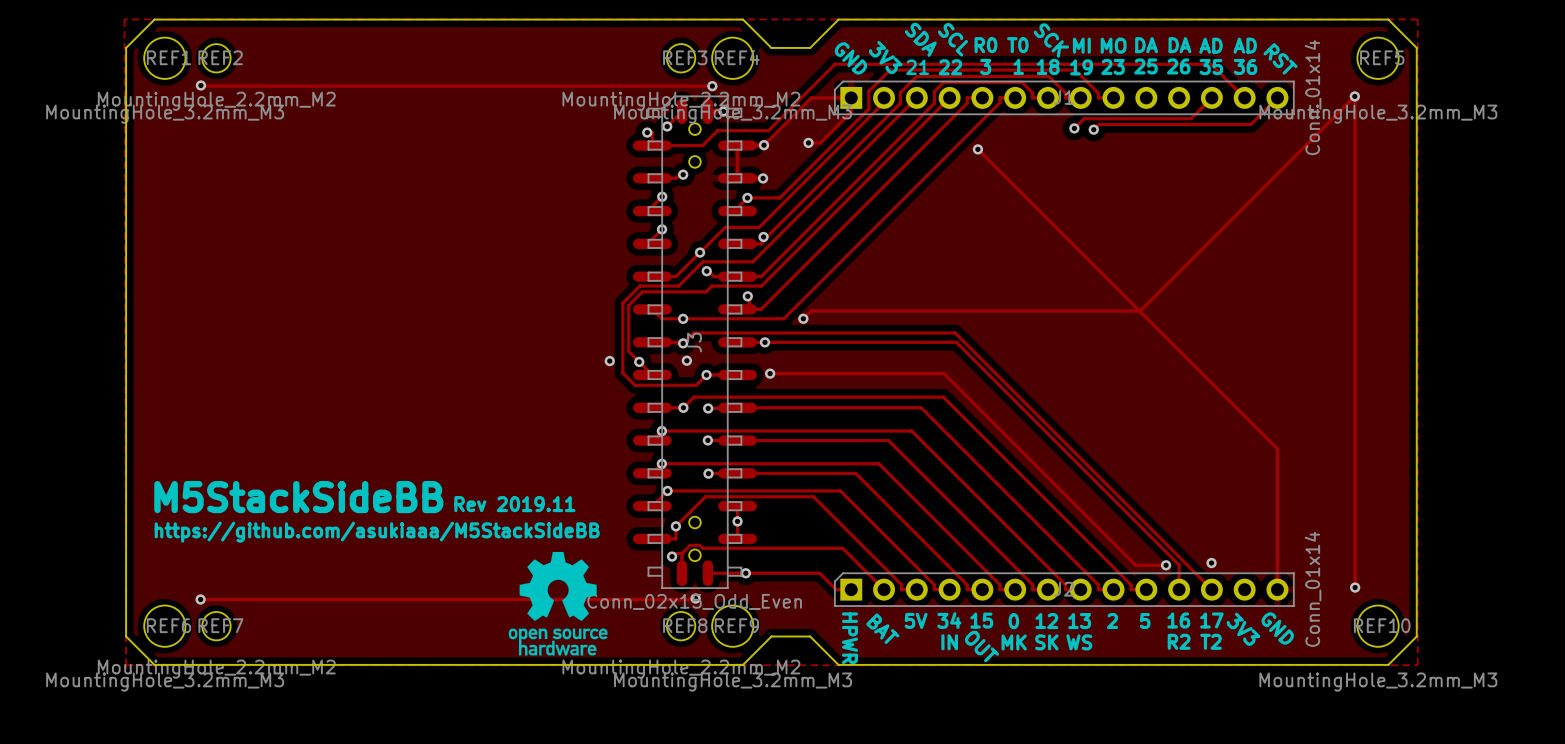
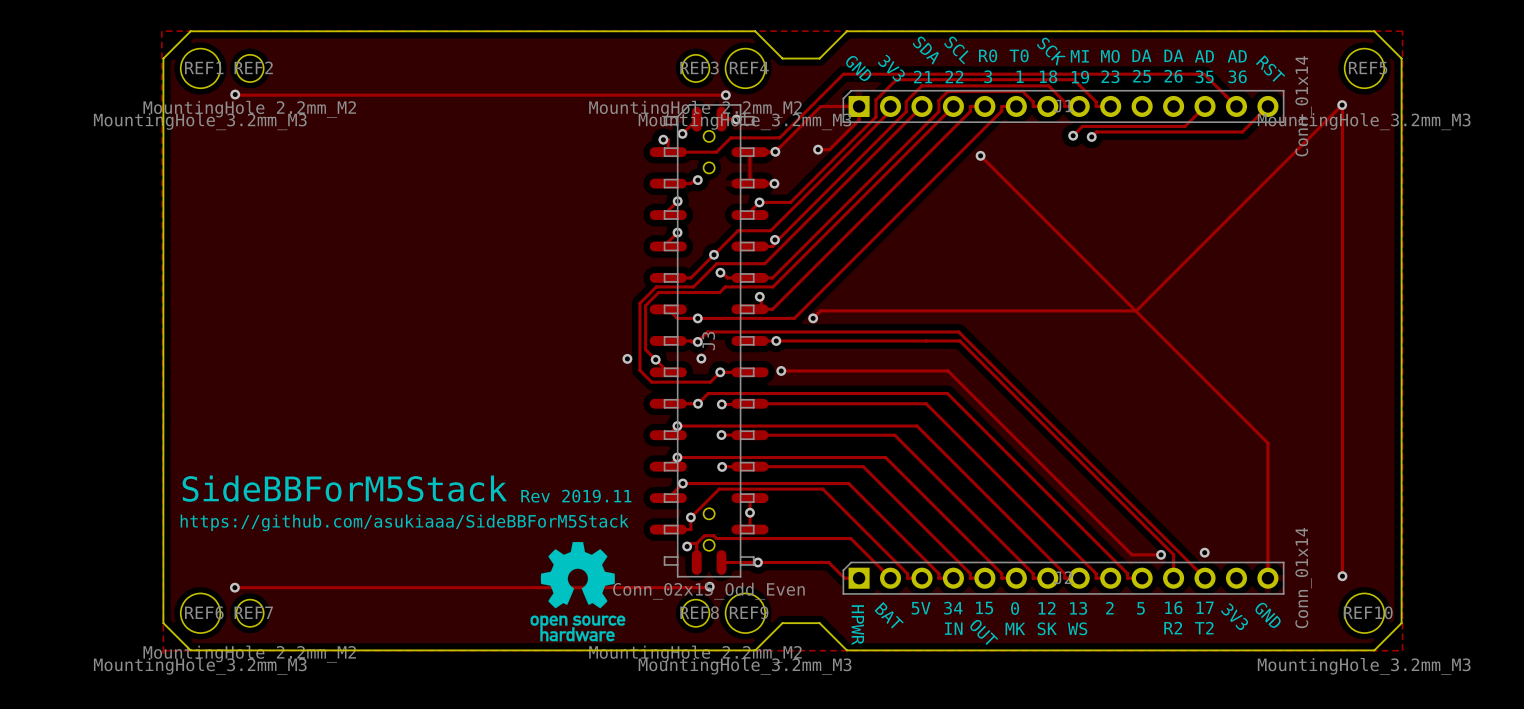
text: none -> SideBBForM5Stack (344, 488)
text: M5StackSideBB (298, 497) -> none
text position: Rev 2019.11 (514, 504) -> Rev 2019.11 (576, 496)
text: https://github.com/asukiaaa/M5StackSideBB (377, 532) -> https://github.com/asukiaaa/SideBBForM5Stack (404, 522)

